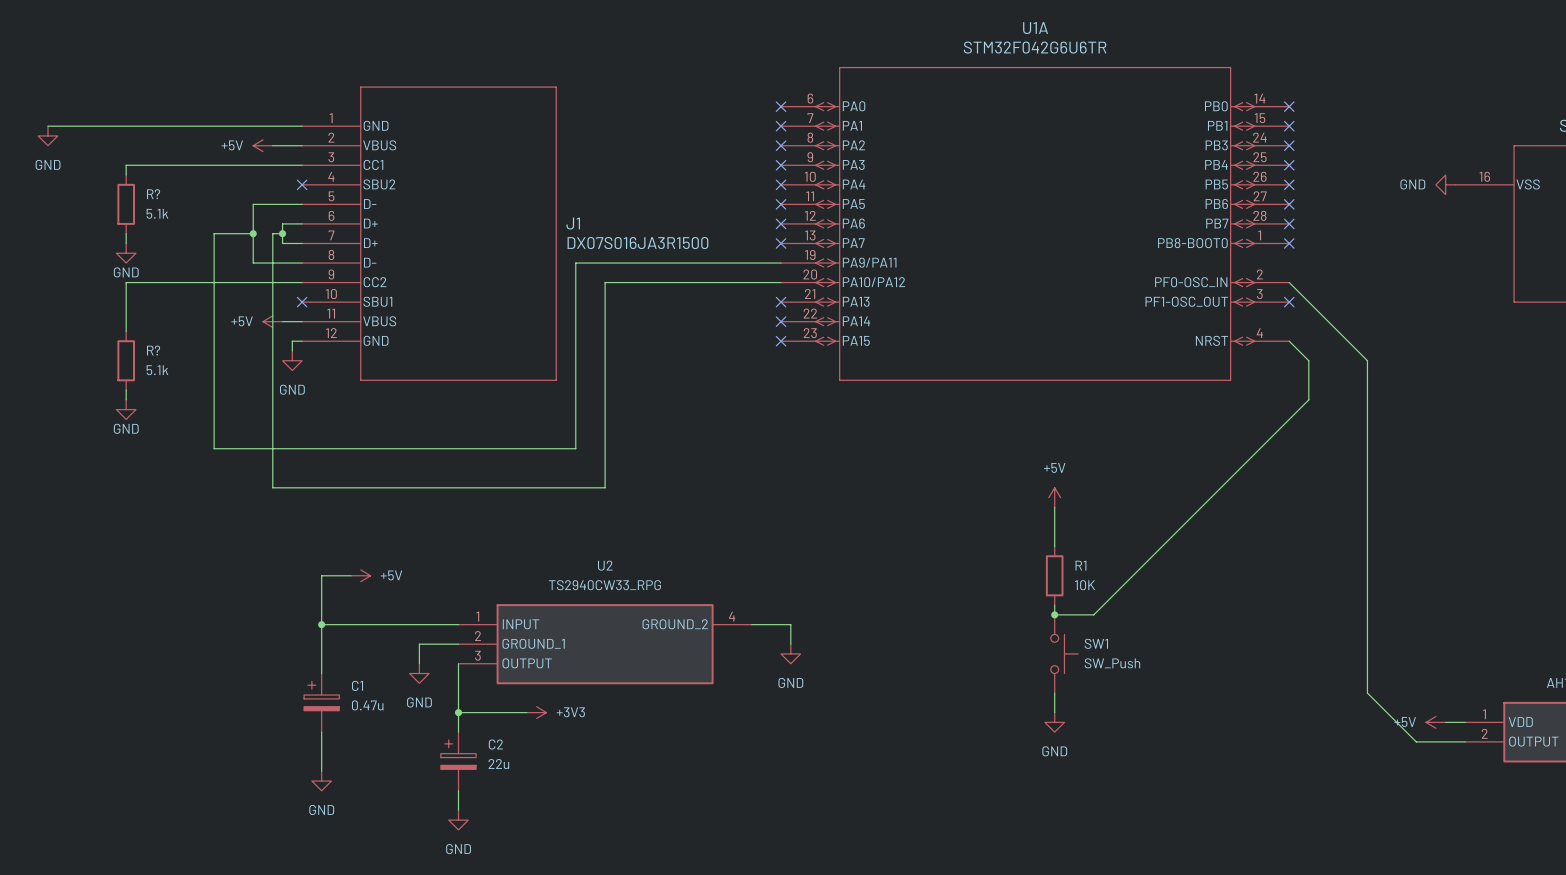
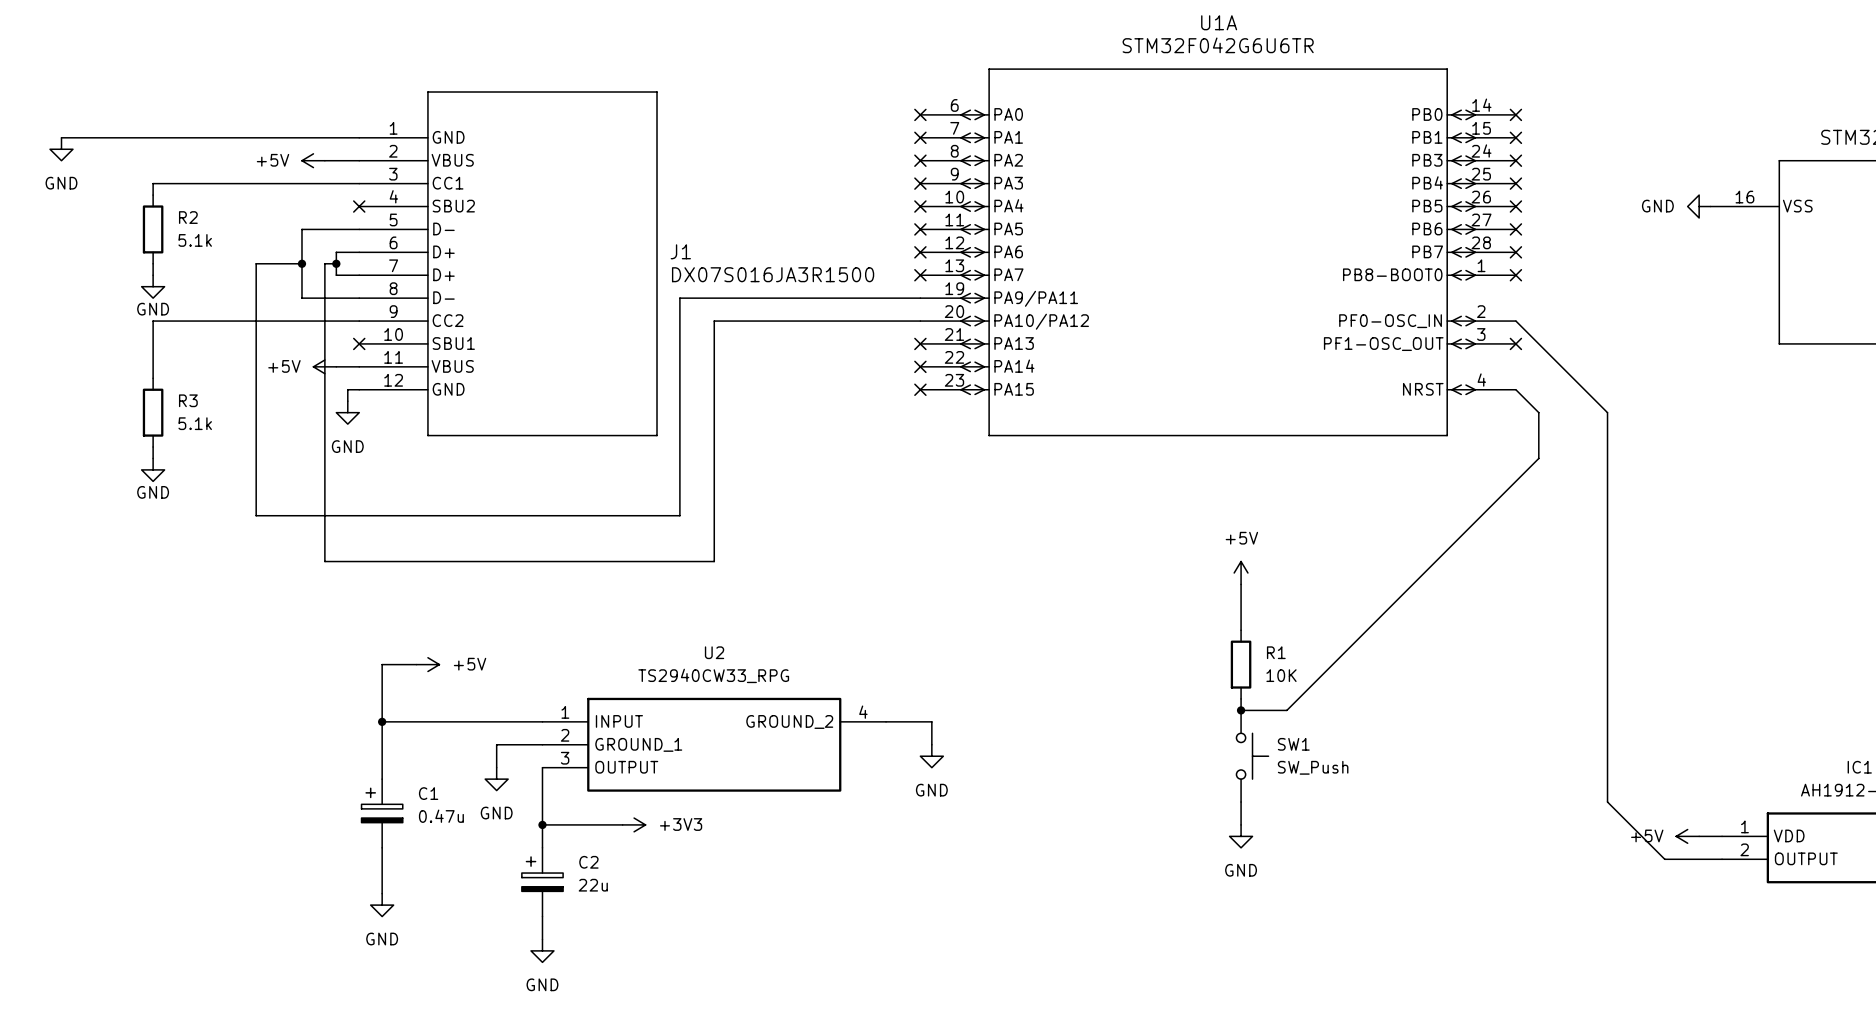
R? name: R? (153, 194) -> R2 (188, 217)
R? name: R? (153, 350) -> R3 (188, 400)

